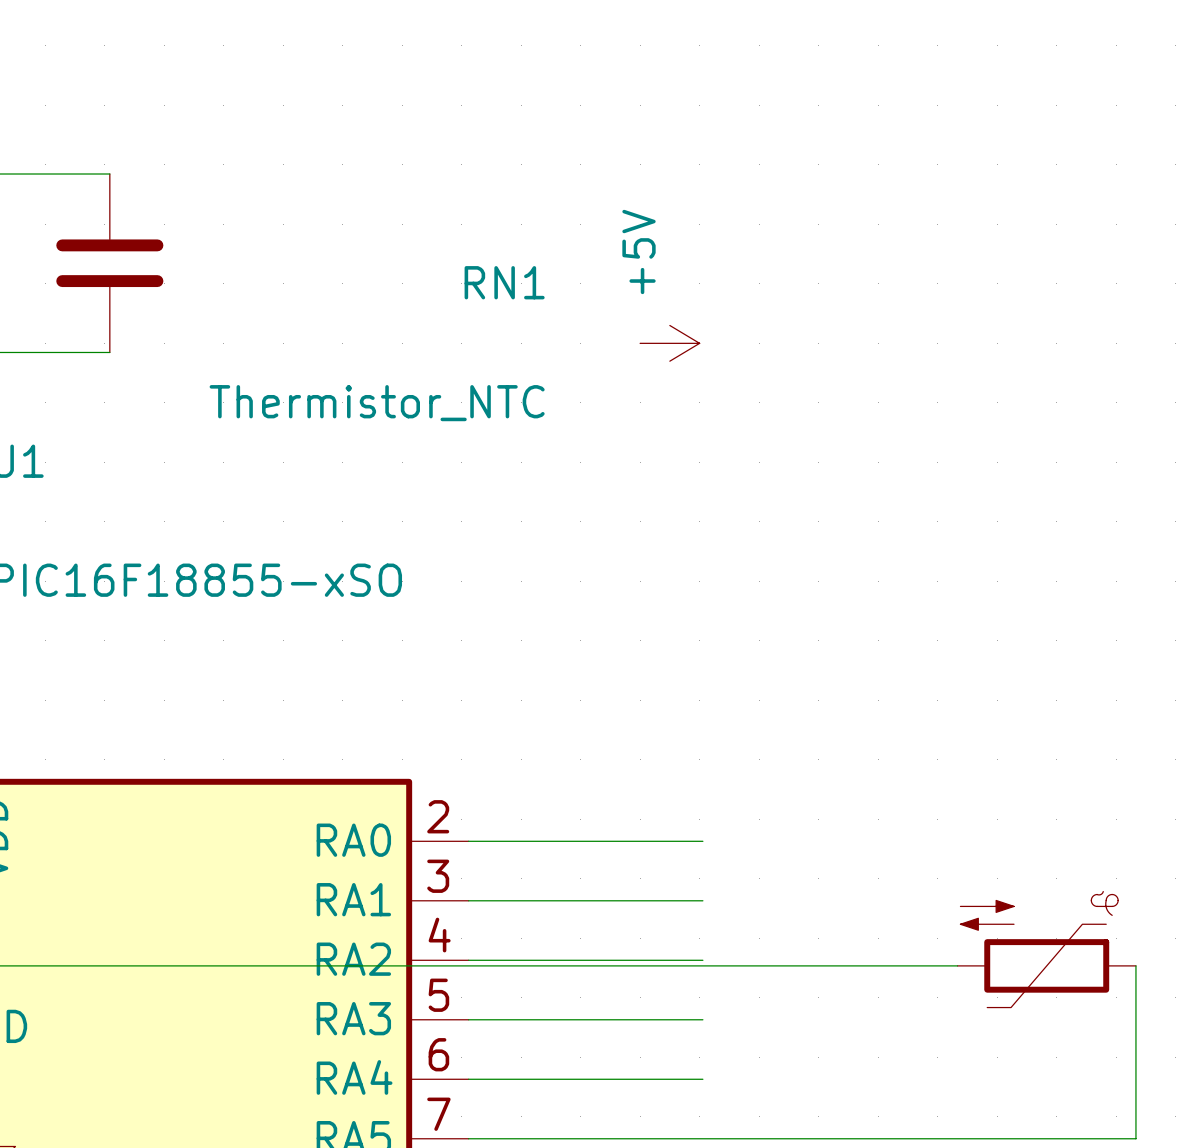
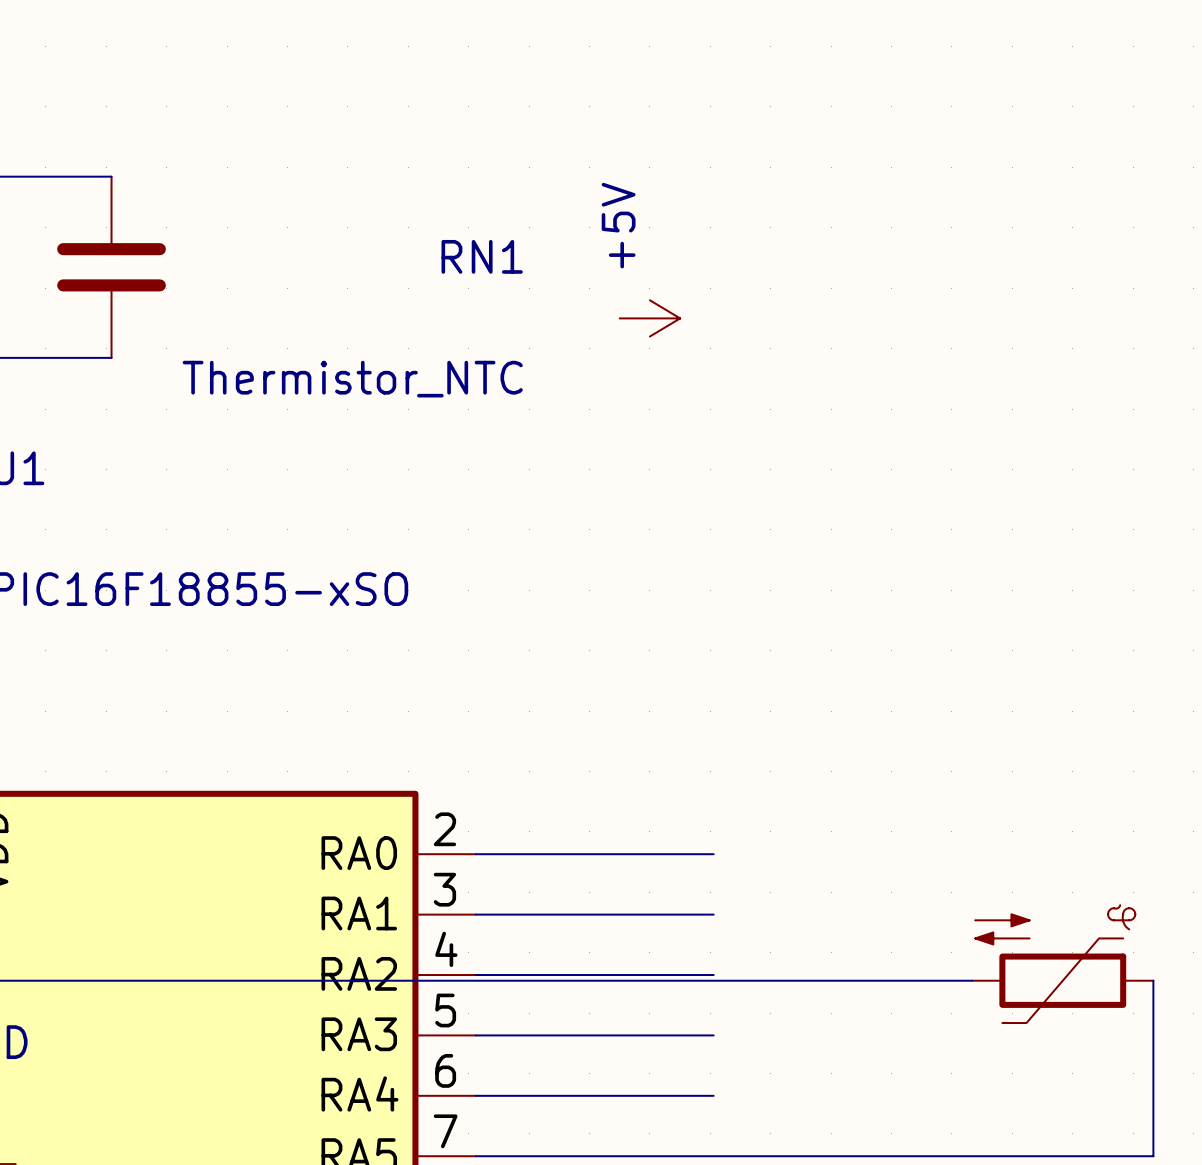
RN1 name position: RN1 (504, 282) -> RN1 (482, 256)
power symbol position: +5V (669, 343) -> +5V (649, 318)
RN1 value position: Thermistor_NTC (377, 403) -> Thermistor_NTC (352, 379)

